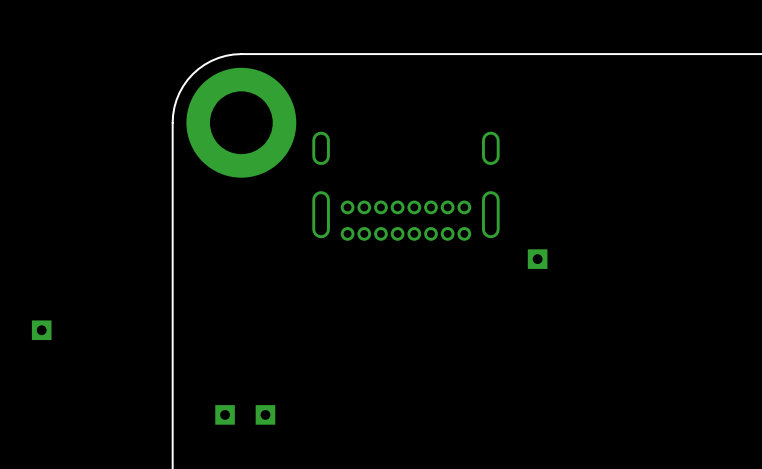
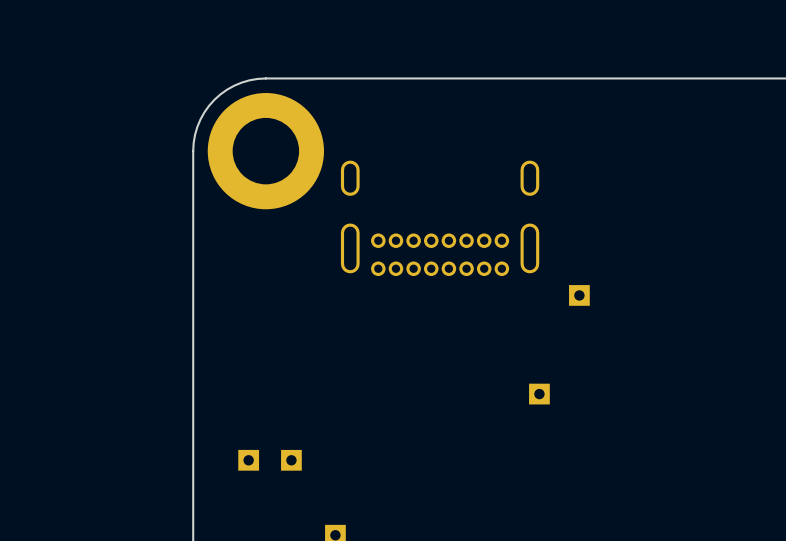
part: (41, 330) -> none
part: none -> (539, 394)

